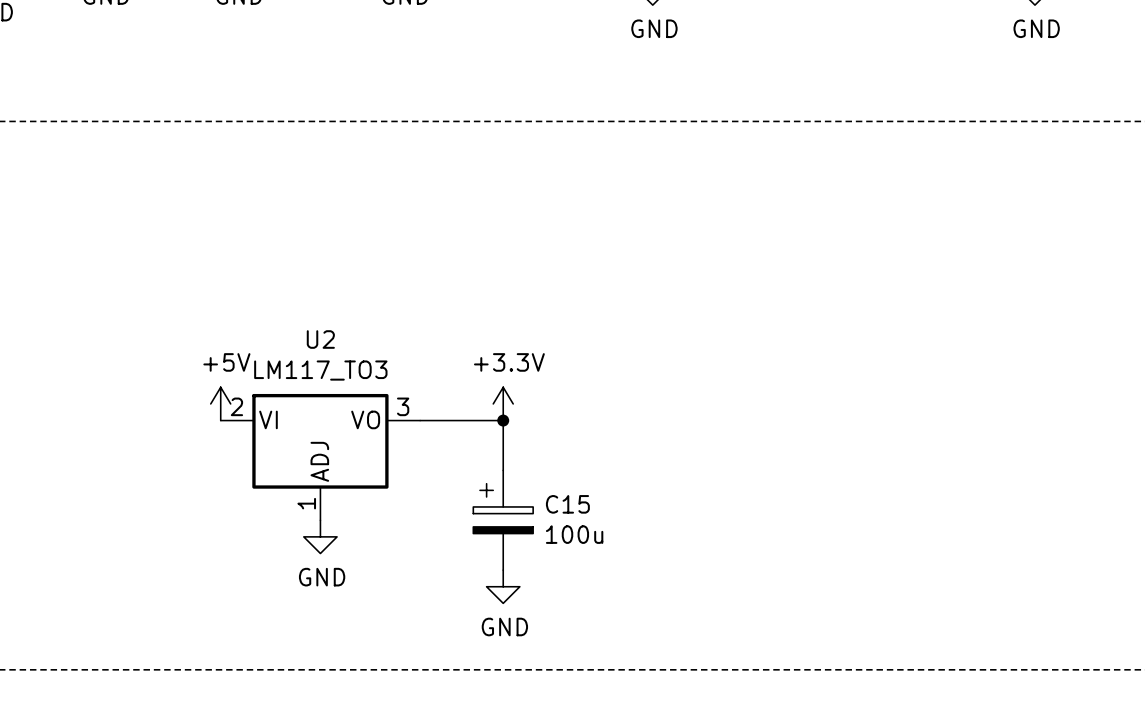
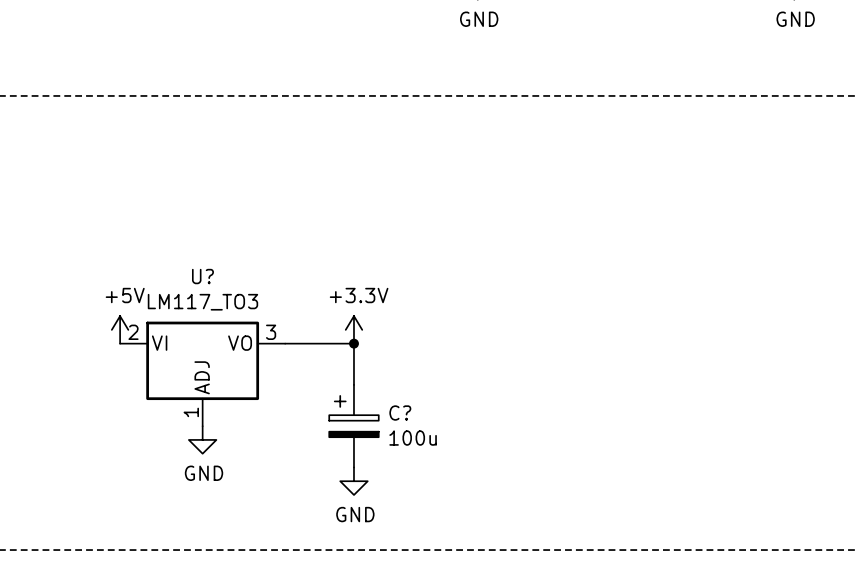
U2 name: U2 (320, 339) -> U? (202, 276)
C15 name: C15 (567, 504) -> C? (400, 413)

